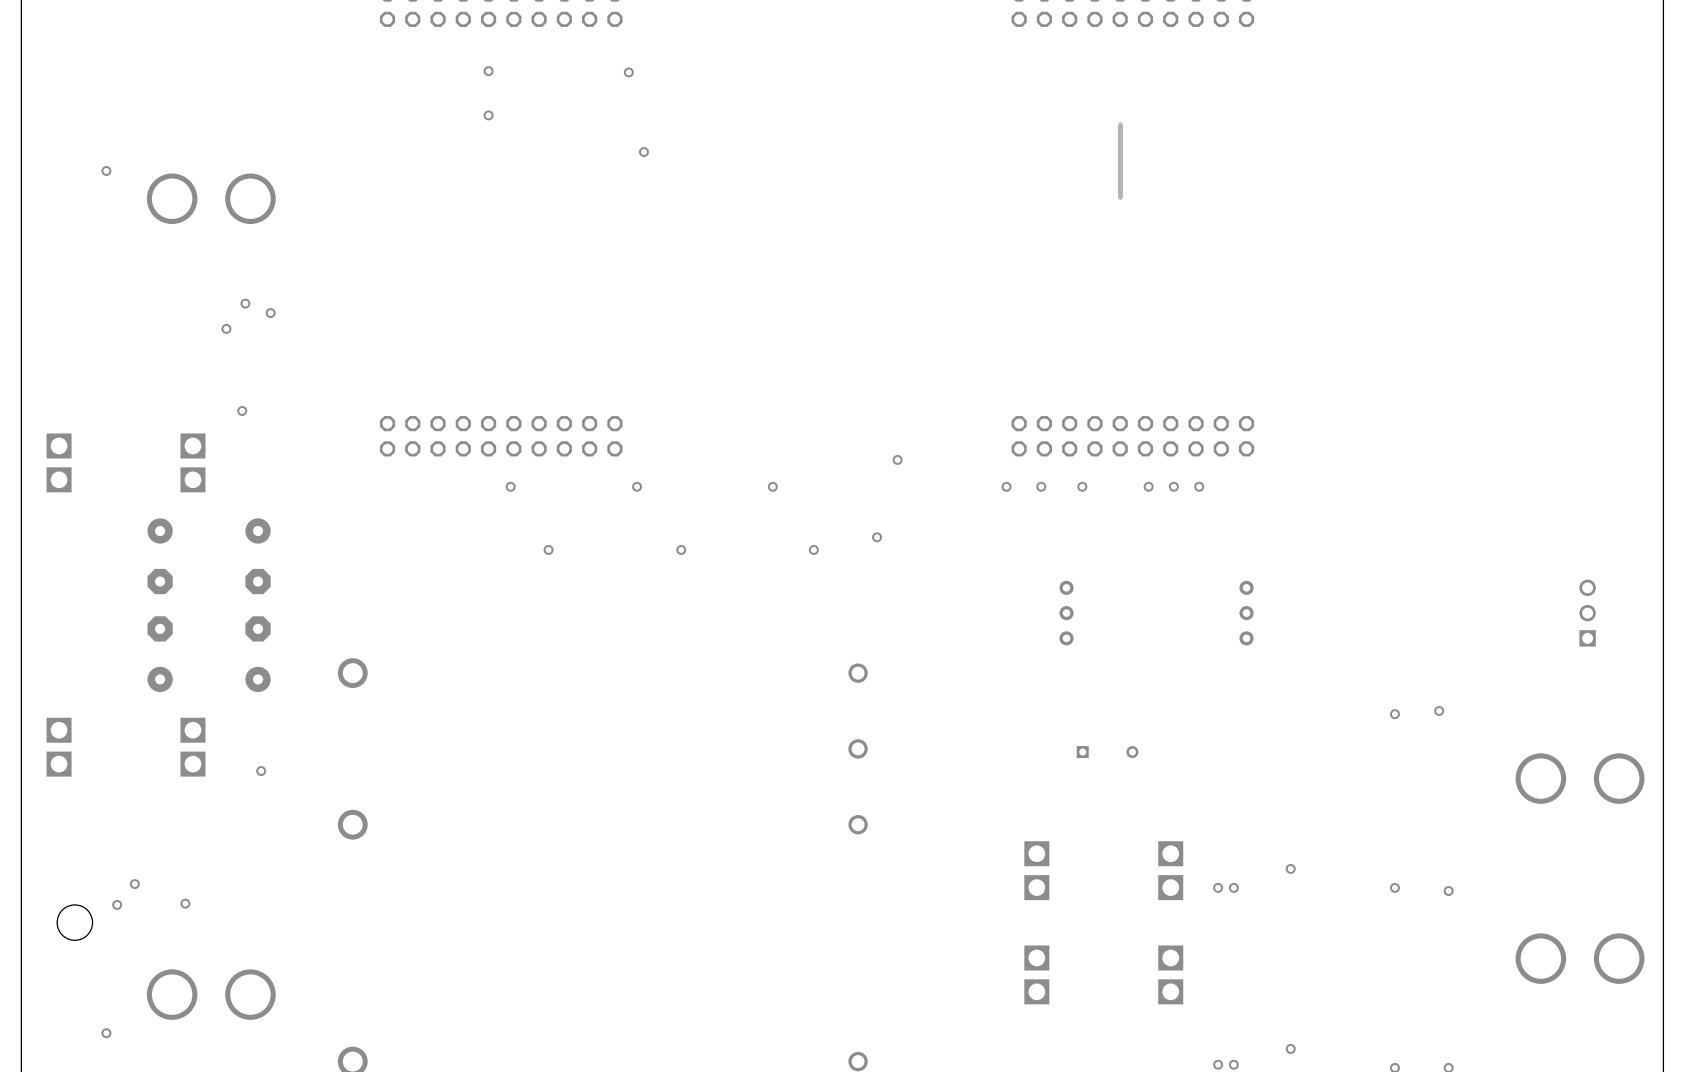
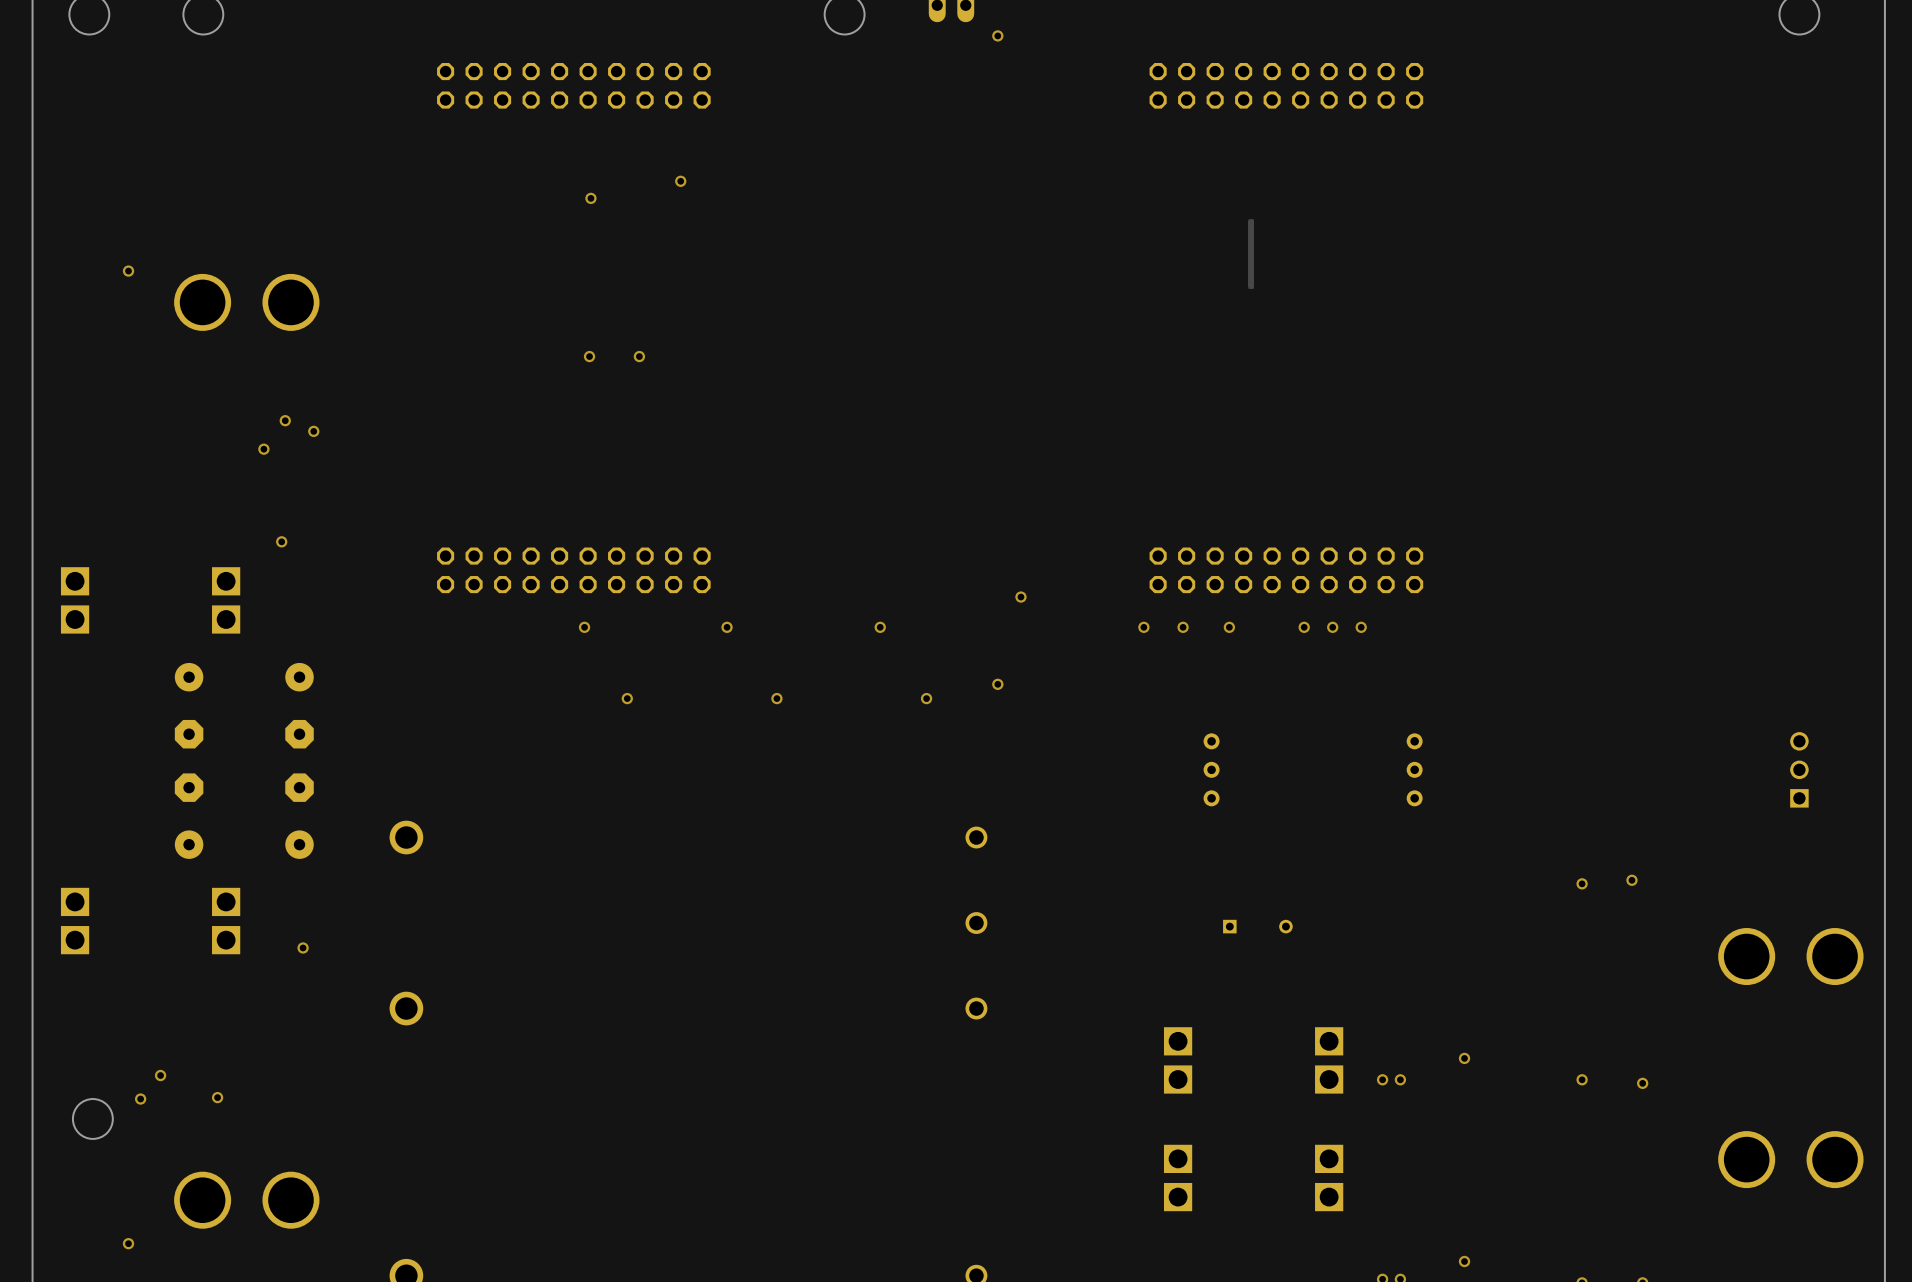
via: (488, 71) -> none
via position: (628, 72) -> (680, 181)
via: none -> (590, 198)
via: (488, 115) -> none
via: (643, 152) -> none
via: none -> (589, 356)
via: none -> (639, 356)

